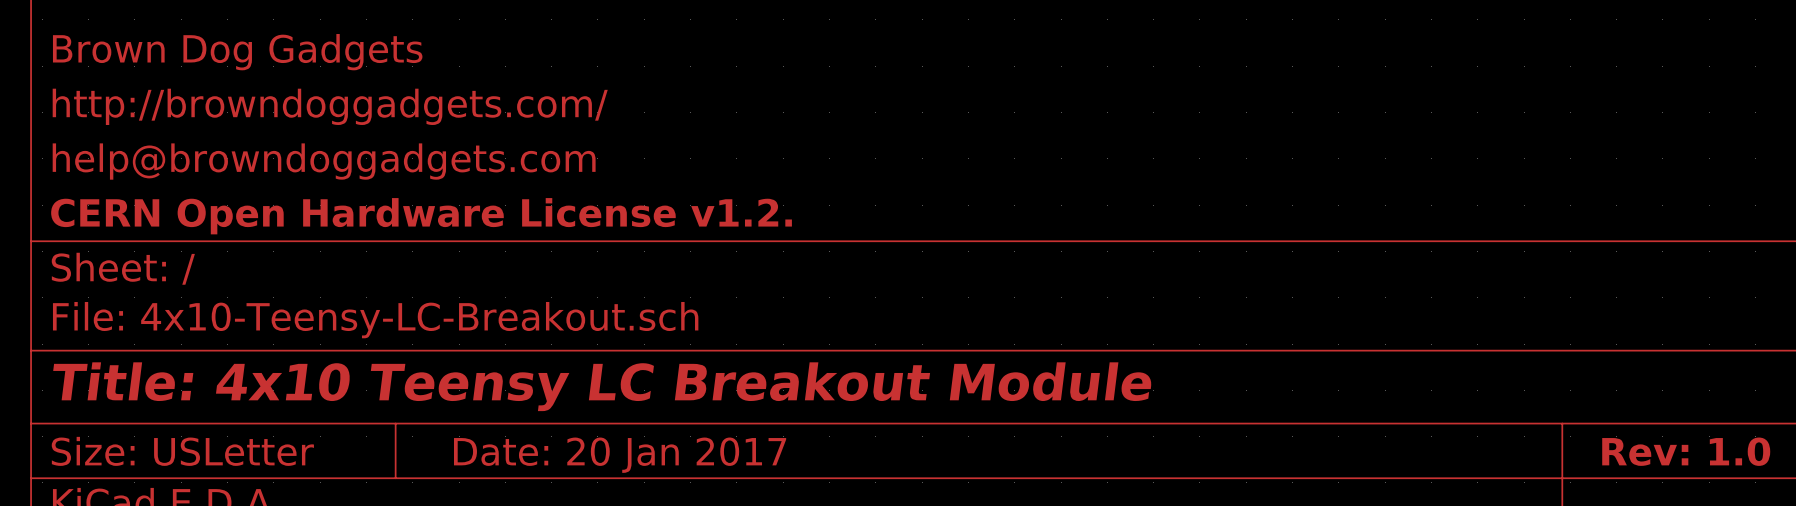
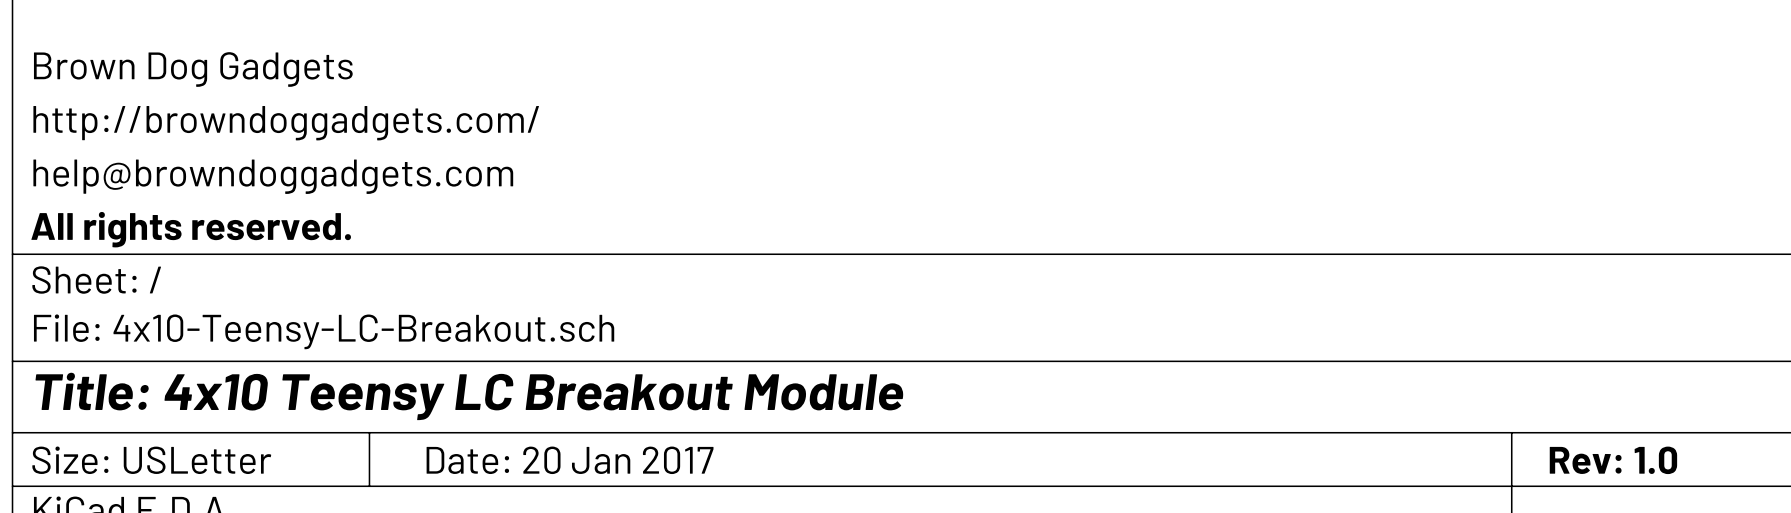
title block: CERN Open Hardware License v1.2. (421, 216) -> All rights reserved. (191, 229)

